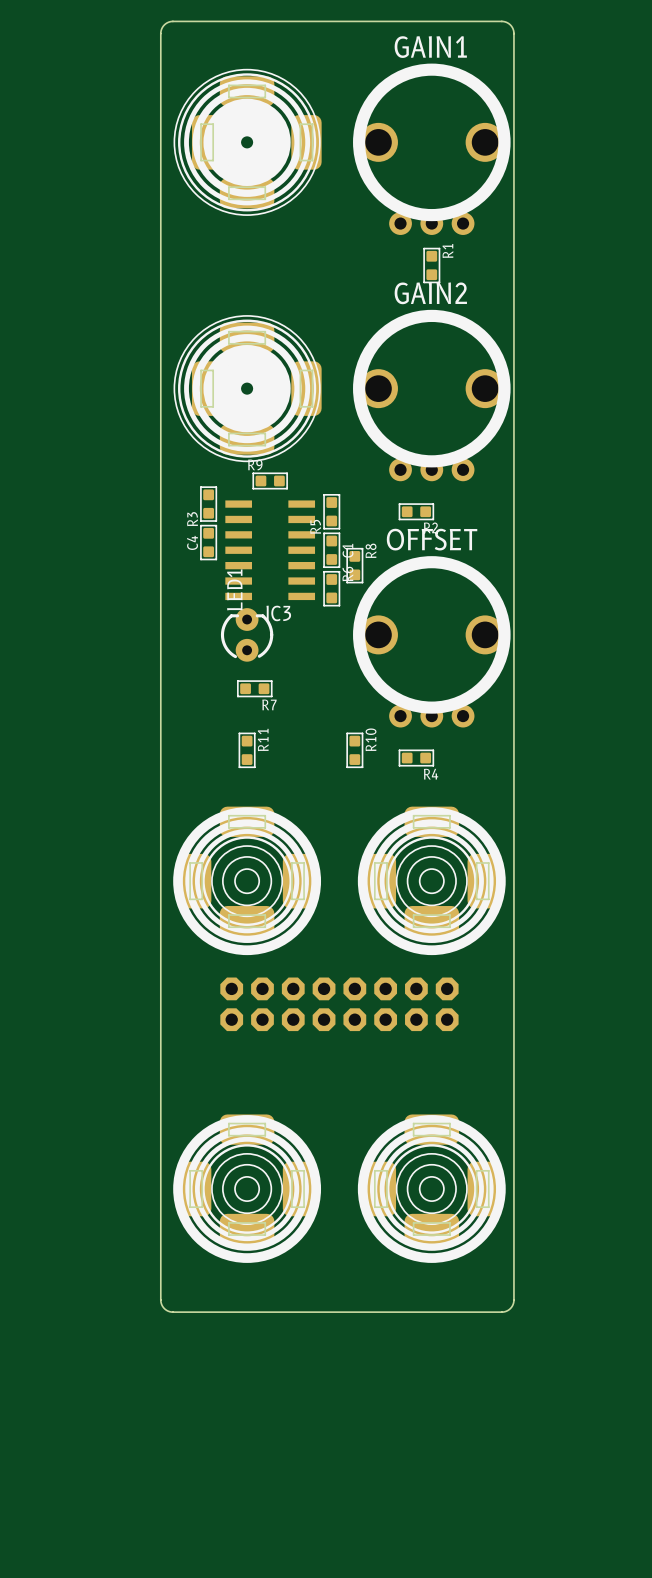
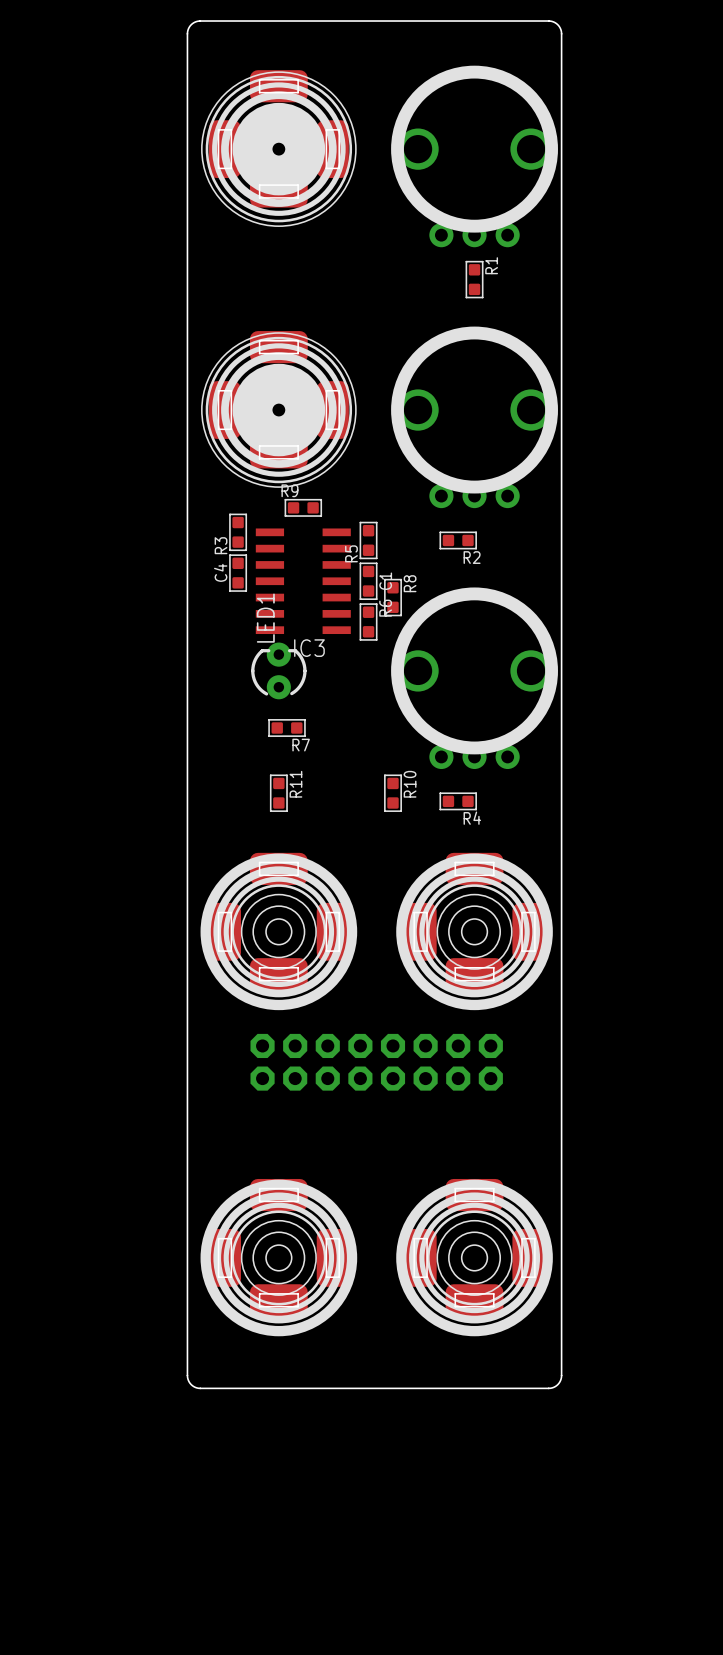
GAIN1 name: GAIN1 (430, 47) -> none
part rotation: 0° (247, 142) -> 90° counterclockwise (278, 148)
GAIN2 name: GAIN2 (430, 293) -> none
part rotation: 0° (247, 388) -> 90° counterclockwise (278, 409)
OFFSET name: OFFSET (432, 539) -> none

